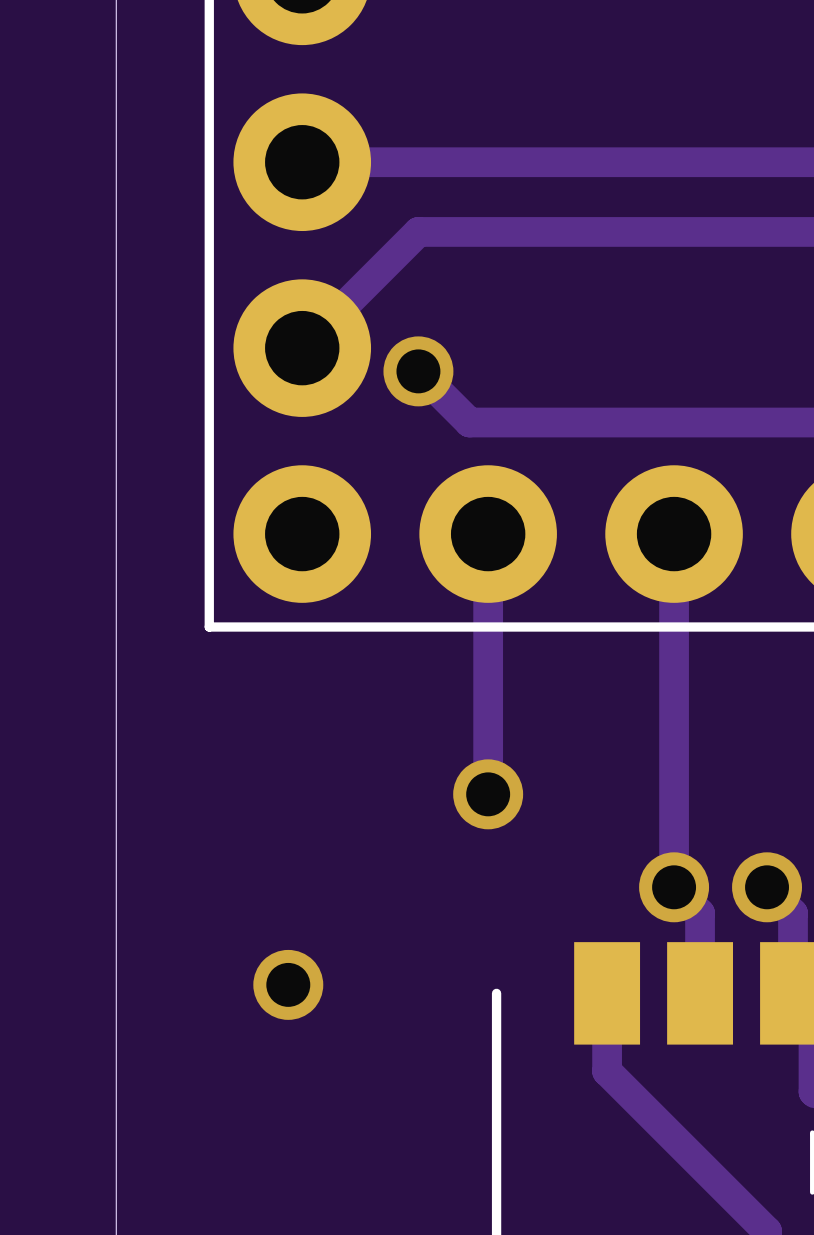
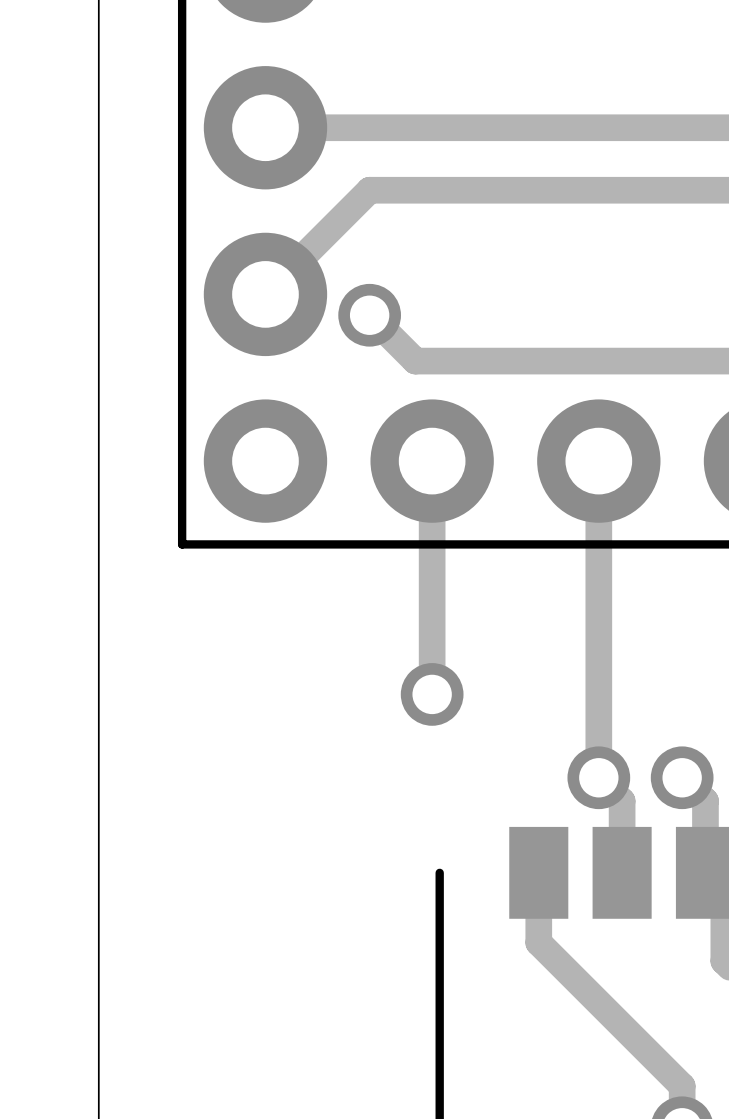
via: (288, 984) -> none

